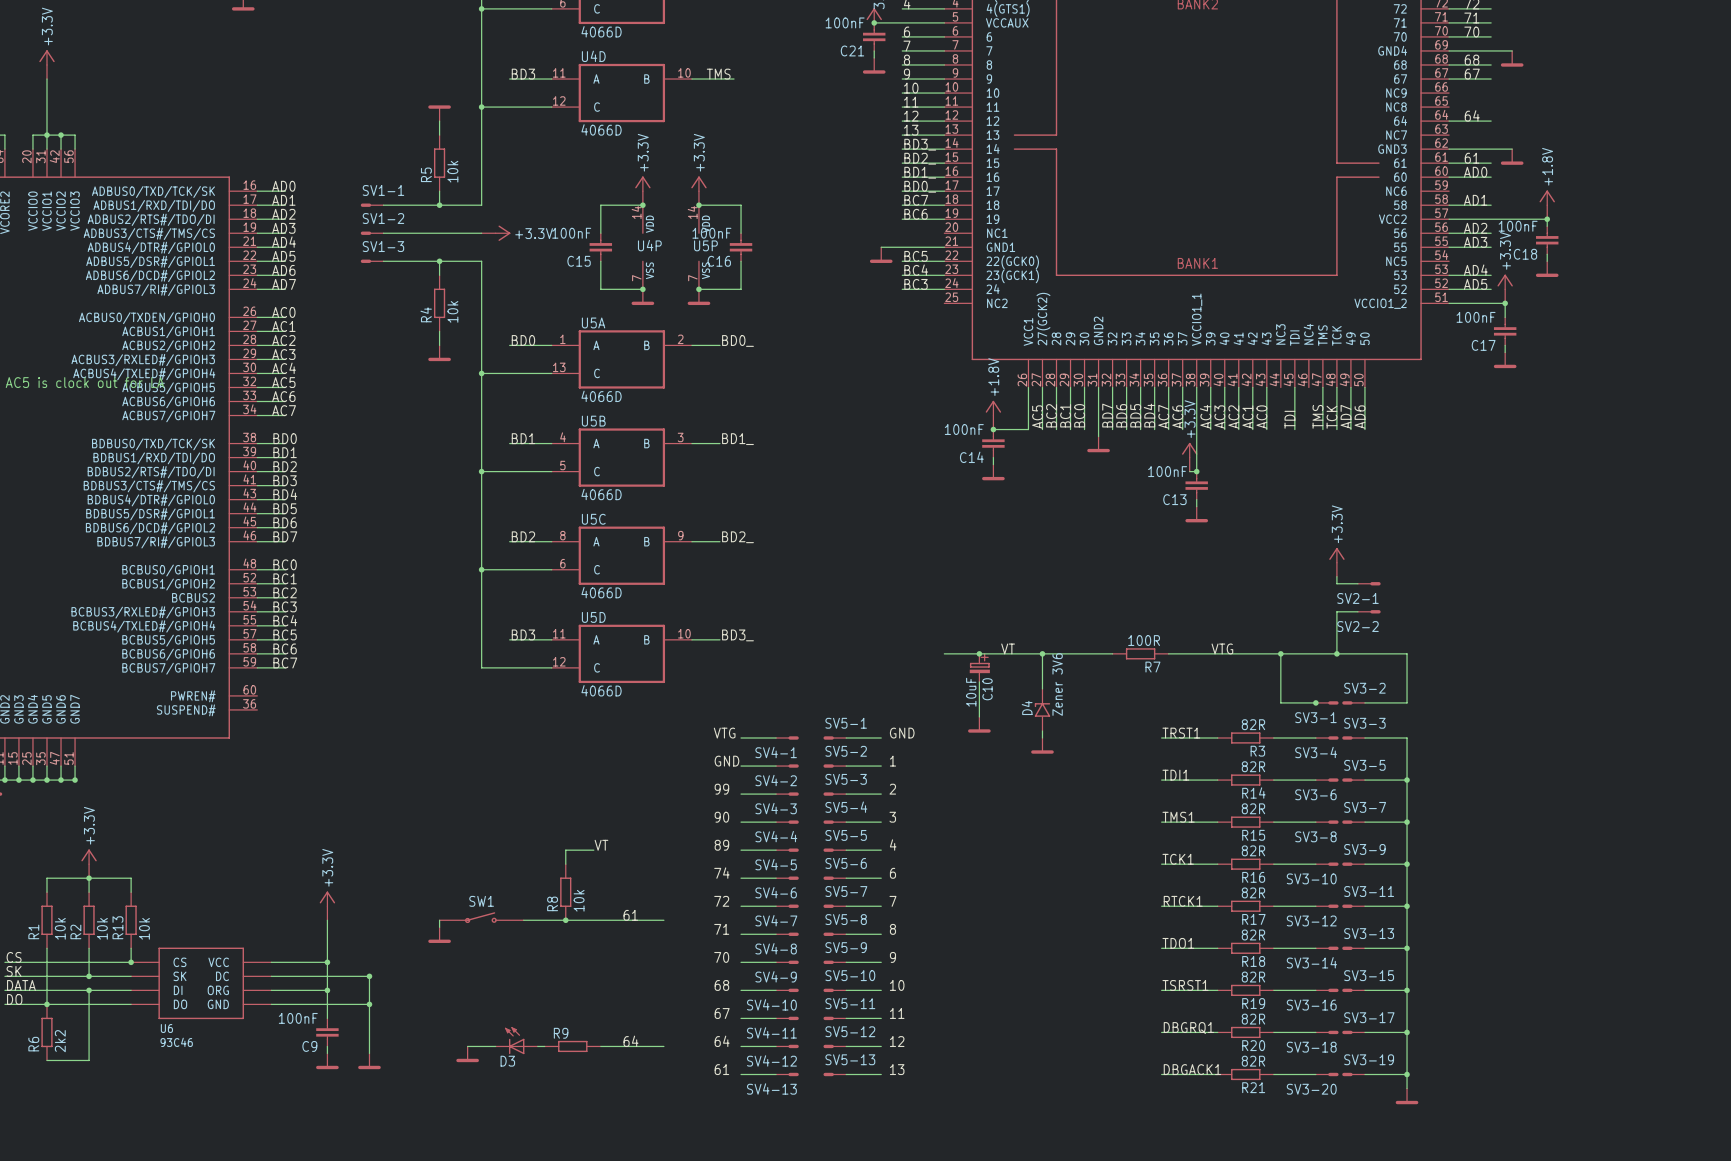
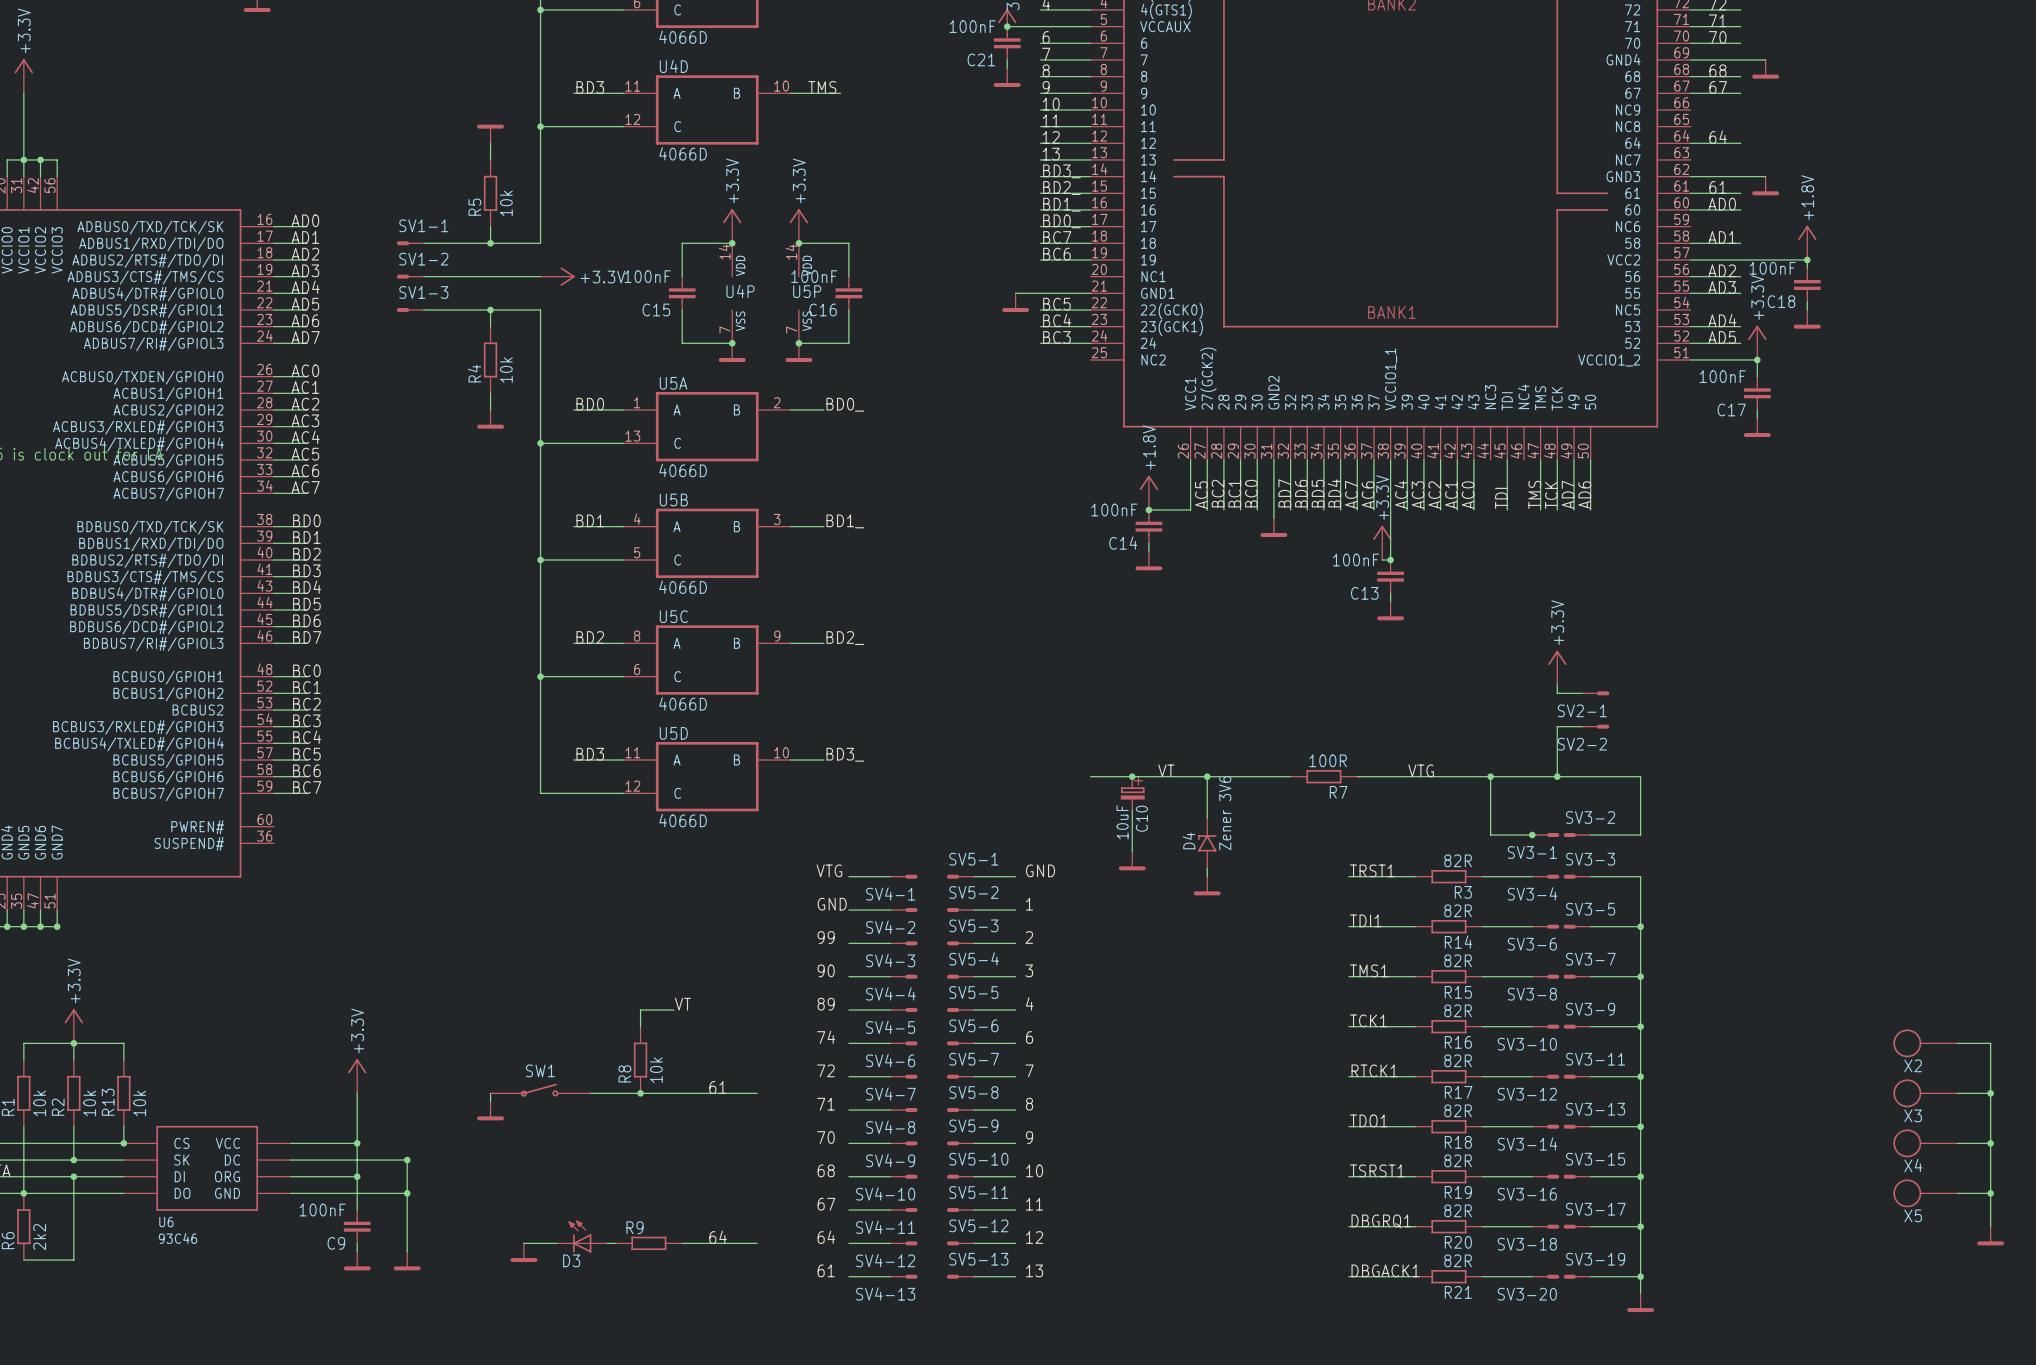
X2: none -> (1925, 1043)
wire: none -> (1957, 1043) (1990, 1043) (1990, 1226)
X3: none -> (1925, 1093)
wire: none -> (1957, 1093) (1990, 1093)
junction: none -> (1990, 1093)
X4: none -> (1925, 1143)
wire: none -> (1957, 1143) (1990, 1143)
junction: none -> (1990, 1143)
X5: none -> (1925, 1193)
wire: none -> (1957, 1193) (1990, 1193)
junction: none -> (1990, 1193)
power symbol: none -> (1990, 1236)

